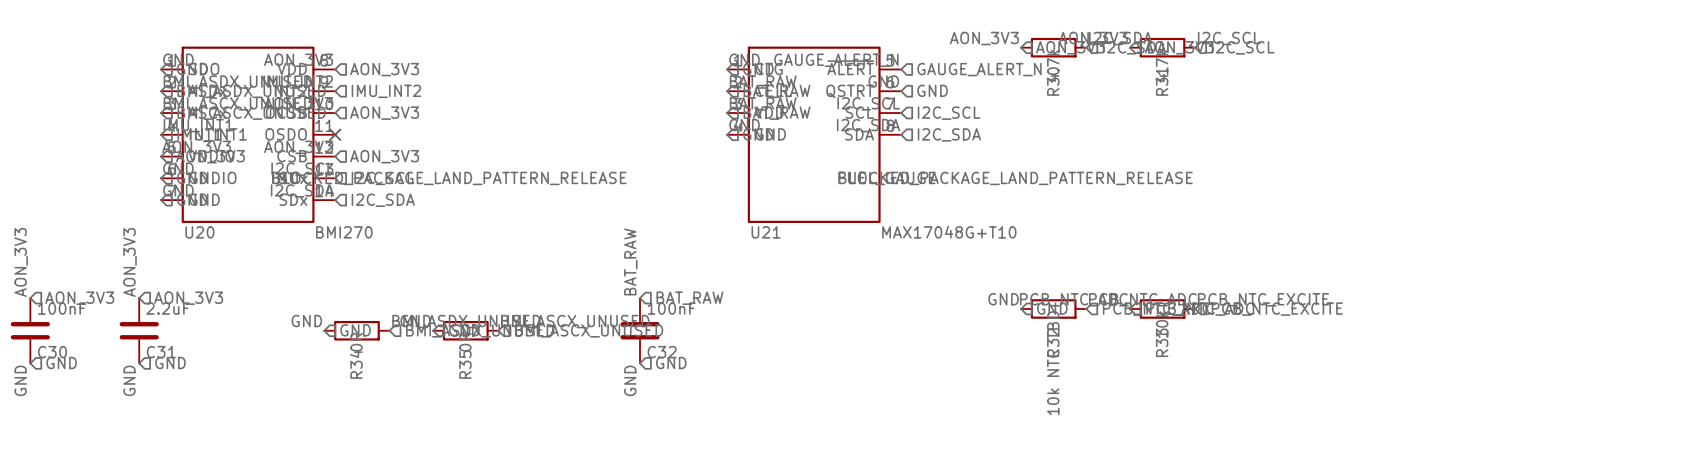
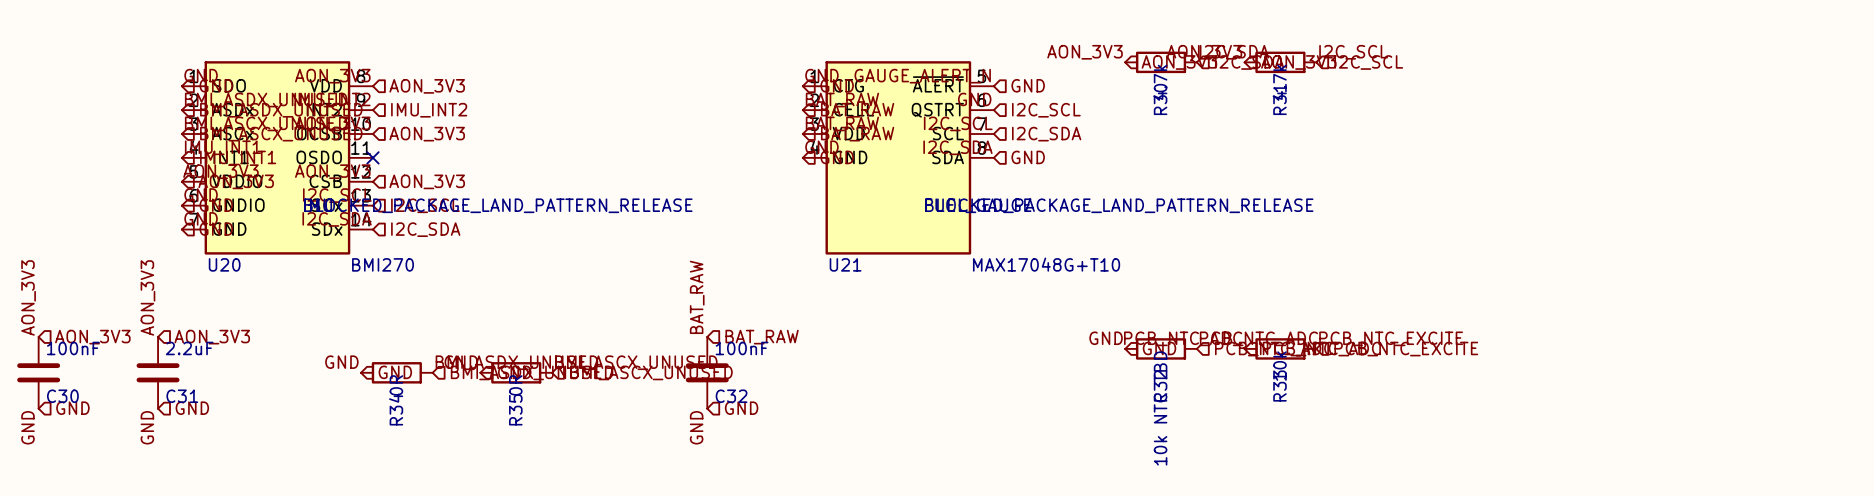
hierarchical label: GAUGE_ALERT_N (979, 69) -> GND (1028, 85)
hierarchical label: GND (932, 90) -> I2C_SCL (1046, 110)
hierarchical label: I2C_SCL (949, 113) -> I2C_SDA (1046, 134)
hierarchical label: I2C_SDA (949, 134) -> GND (1028, 157)

